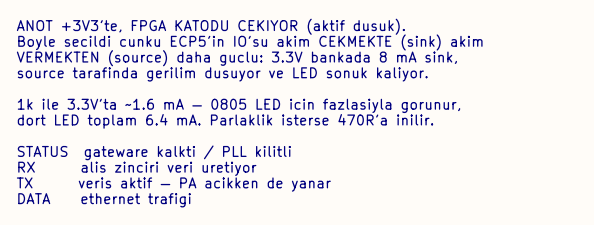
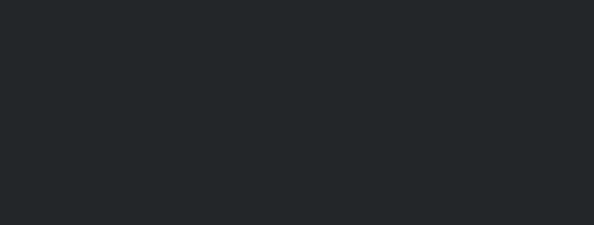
text: ANOT +3V3'te, FPGA KATODU CEKIYOR (aktif dusuk). (210, 26) -> none
text: Boyle secildi cunku ECP5'in IO'su akim CEKMEKTE (sink) akim (250, 42) -> none
text: VERMEKTEN (source) daha guclu: 3.3V bankada 8 mA sink, (236, 58) -> none
text: source tarafinda gerilim dusuyor ve LED sonuk kaliyor. (222, 74) -> none
text: 1k ile 3.3V'ta ~1.6 mA — 0805 LED icin fazlasiyla gorunur, (239, 105) -> none
text: dort LED toplam 6.4 mA. Parlaklik isterse 470R'a inilir. (225, 121) -> none
text: STATUS gateware kalkti / PLL kilitli (154, 152) -> none
text: RX alis zinciri veri uretiyor (137, 168) -> none
text: TX veris aktif — PA acikken de yanar (173, 184) -> none
text: DATA ethernet trafigi (104, 200) -> none

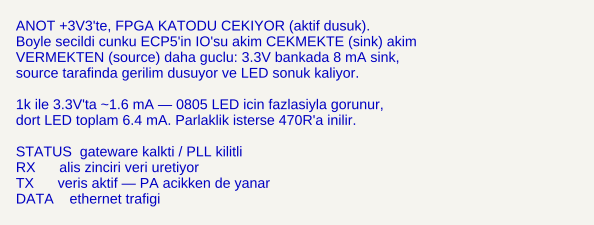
text: none -> ANOT +3V3'te, FPGA KATODU CEKIYOR (aktif dusuk). (192, 26)
text: none -> Boyle secildi cunku ECP5'in IO'su akim CEKMEKTE (sink) akim (216, 42)
text: none -> VERMEKTEN (source) daha guclu: 3.3V bankada 8 mA sink, (207, 58)
text: none -> source tarafinda gerilim dusuyor ve LED sonuk kaliyor. (187, 74)
text: none -> 1k ile 3.3V'ta ~1.6 mA — 0805 LED icin fazlasiyla gorunur, (199, 105)
text: none -> dort LED toplam 6.4 mA. Parlaklik isterse 470R'a inilir. (185, 121)
text: none -> STATUS gateware kalkti / PLL kilitli (128, 152)
text: none -> RX alis zinciri veri uretiyor (107, 168)
text: none -> TX veris aktif — PA acikken de yanar (142, 184)
text: none -> DATA ethernet trafigi (88, 199)

